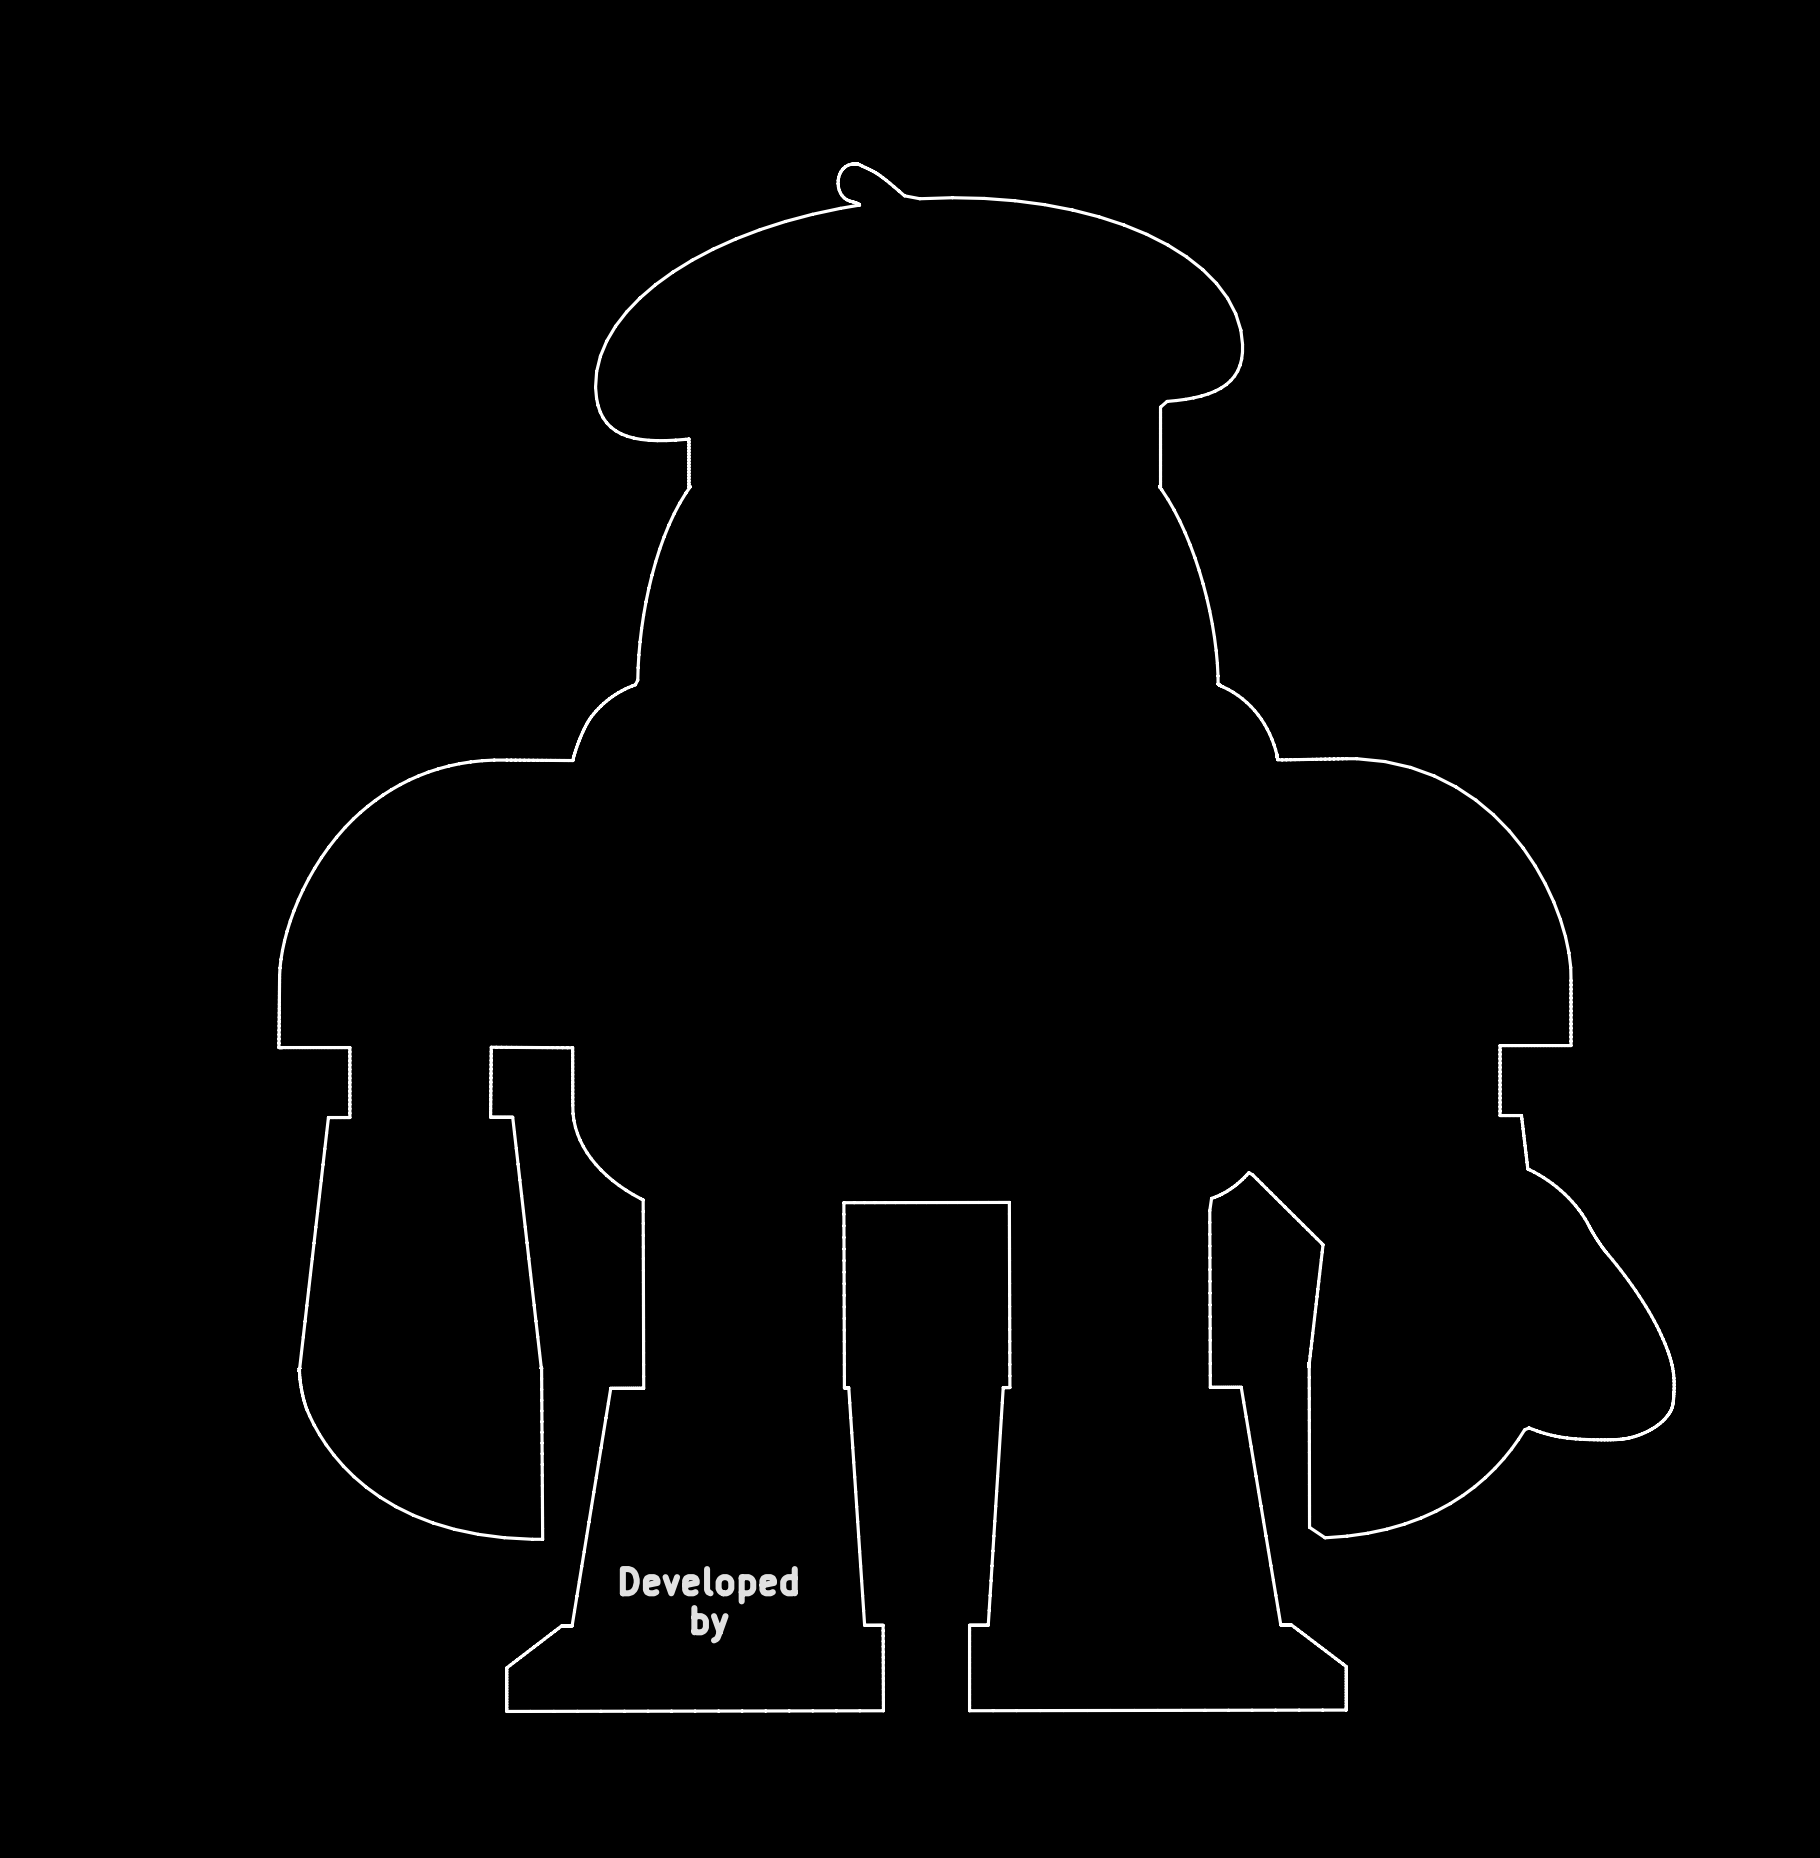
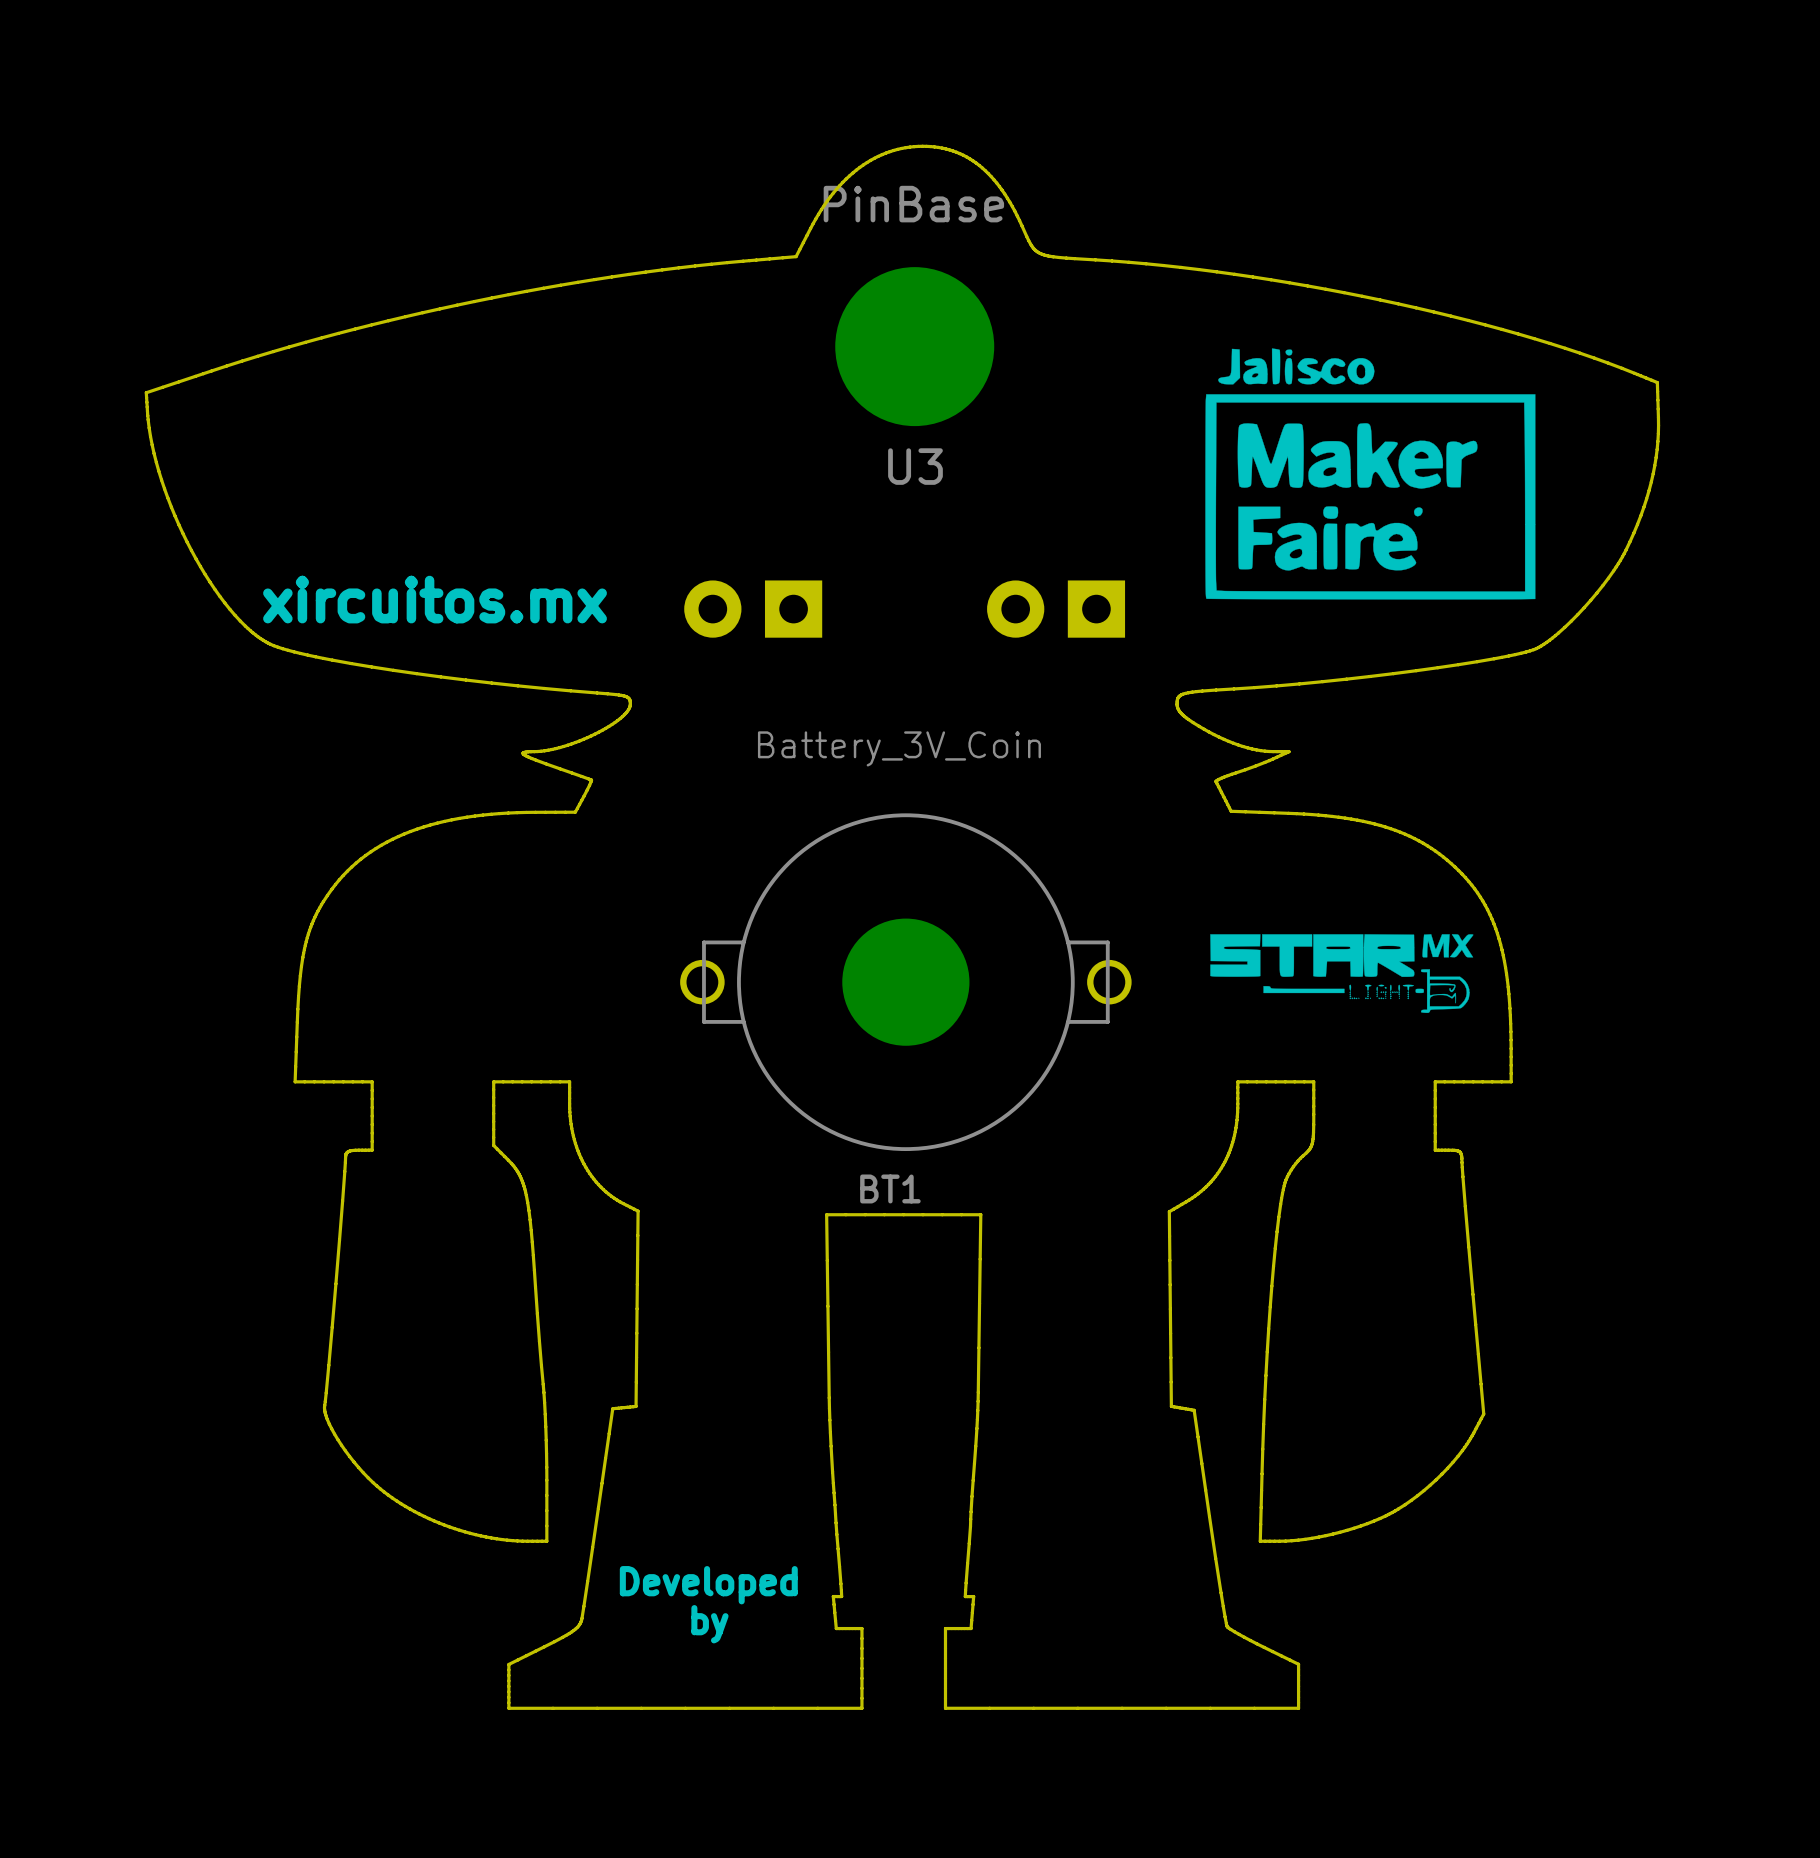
drawing: none -> [144, 144, 1661, 1710]
drawing: [277, 162, 1676, 1714] -> none
U3: none -> PinBase (914, 346)
text: none -> xircuitos.mx (435, 599)
part: none -> (753, 609)
part: none -> (1056, 609)
BT1: none -> Battery_3V_Coin (905, 982)

